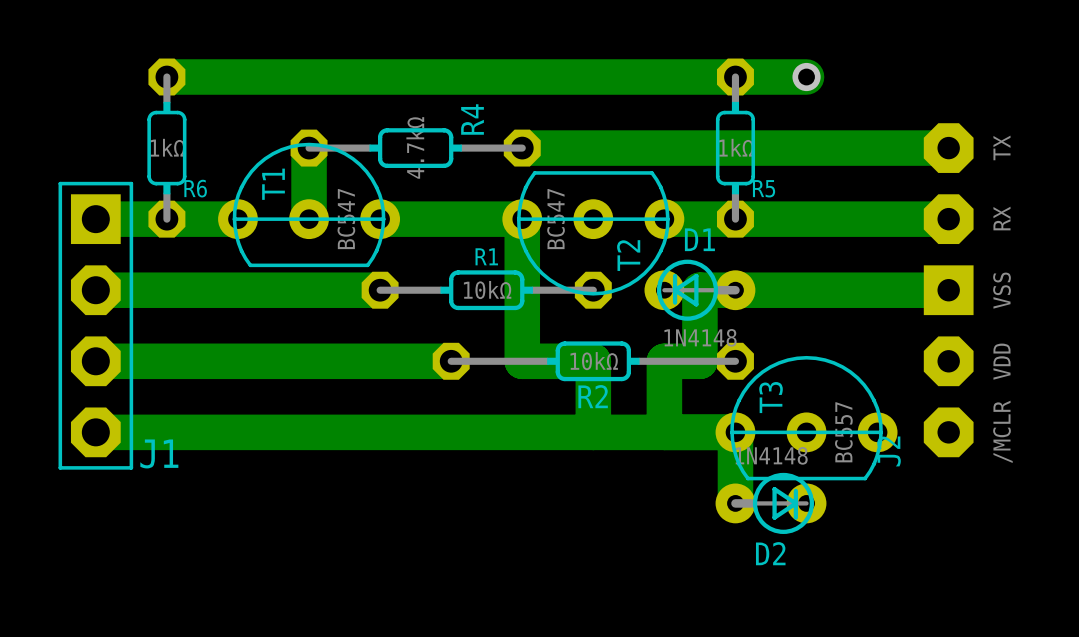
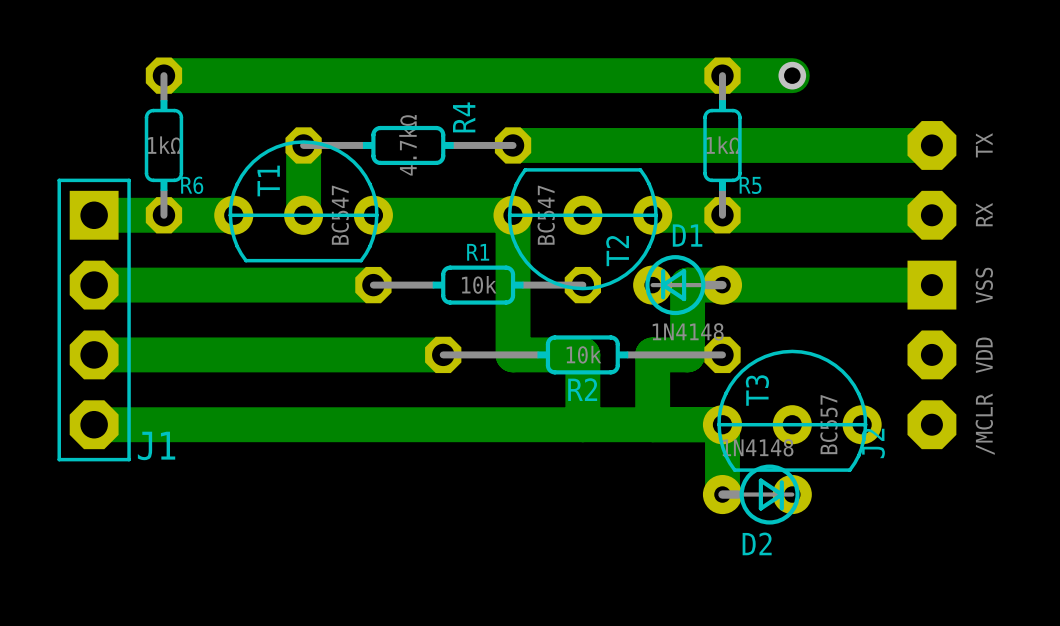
R1 value: 10kΩ (487, 290) -> 10k (479, 284)
R2 value: 10kΩ (594, 361) -> 10k (583, 354)

